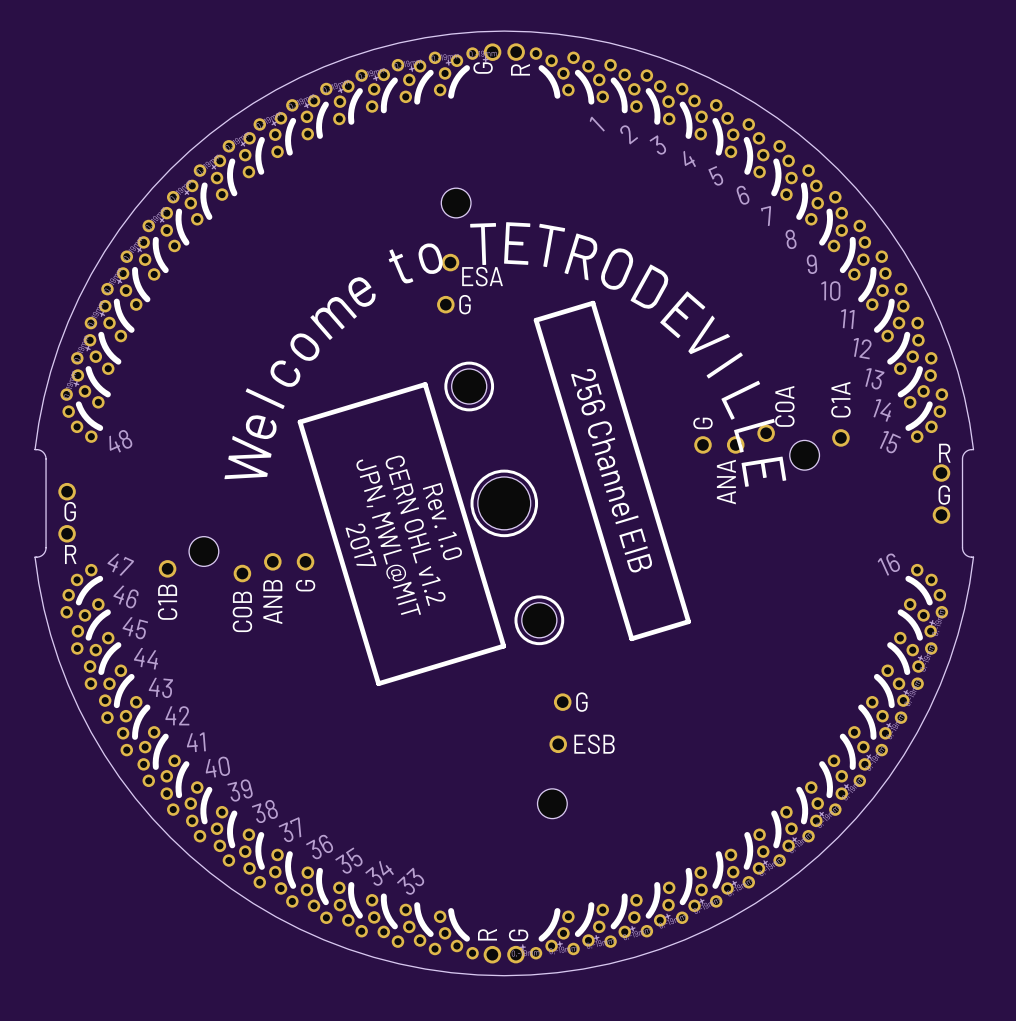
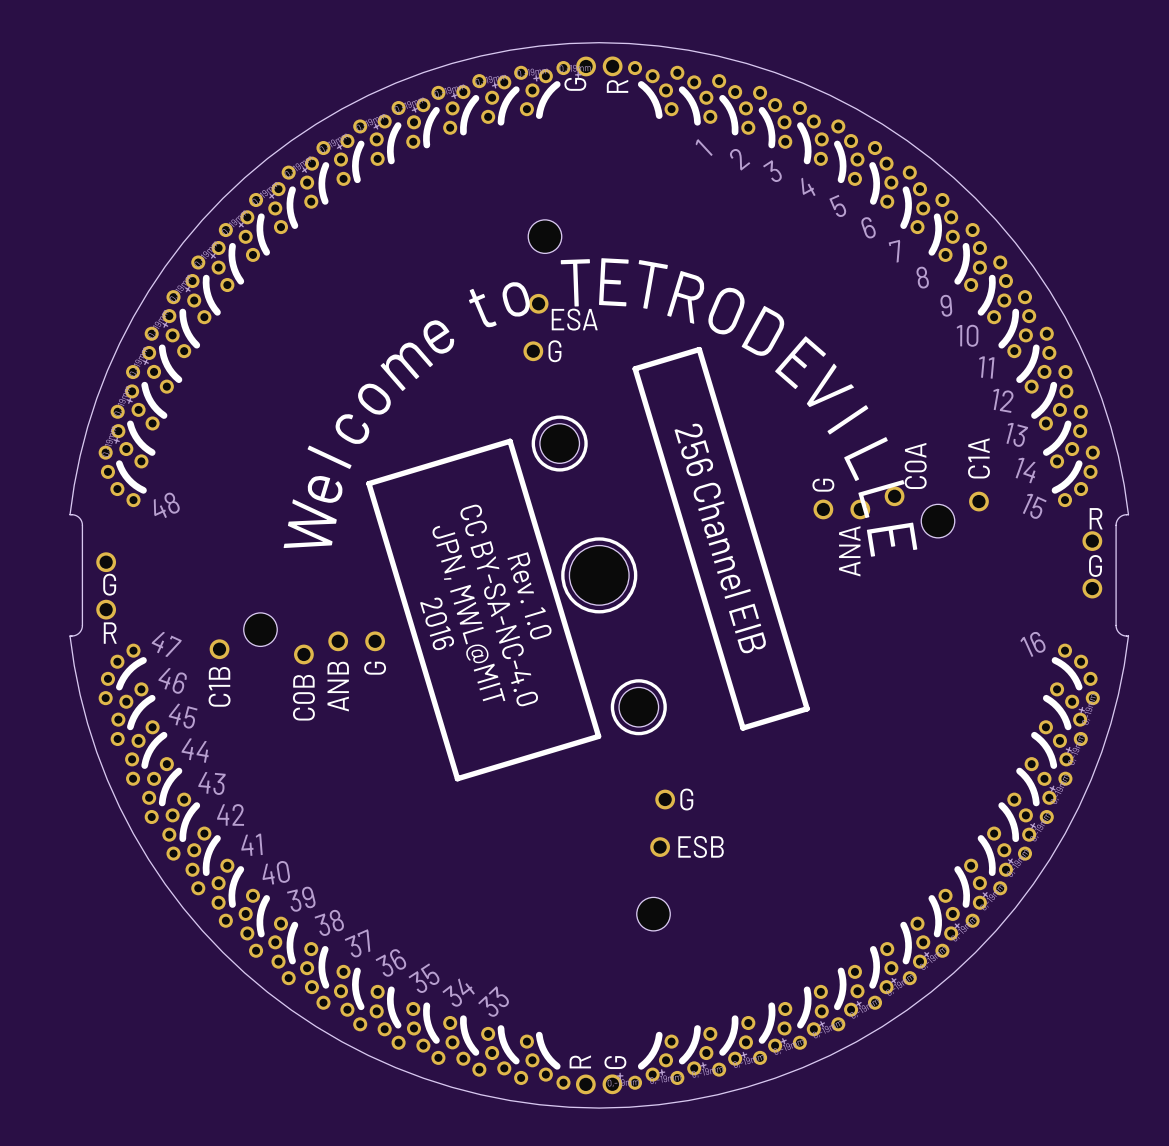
text: CERN OHL v1.2 (415, 530) -> CC BY-SA-NC-4.0 (499, 605)
text: 2017 (361, 544) -> 2016 (437, 623)

